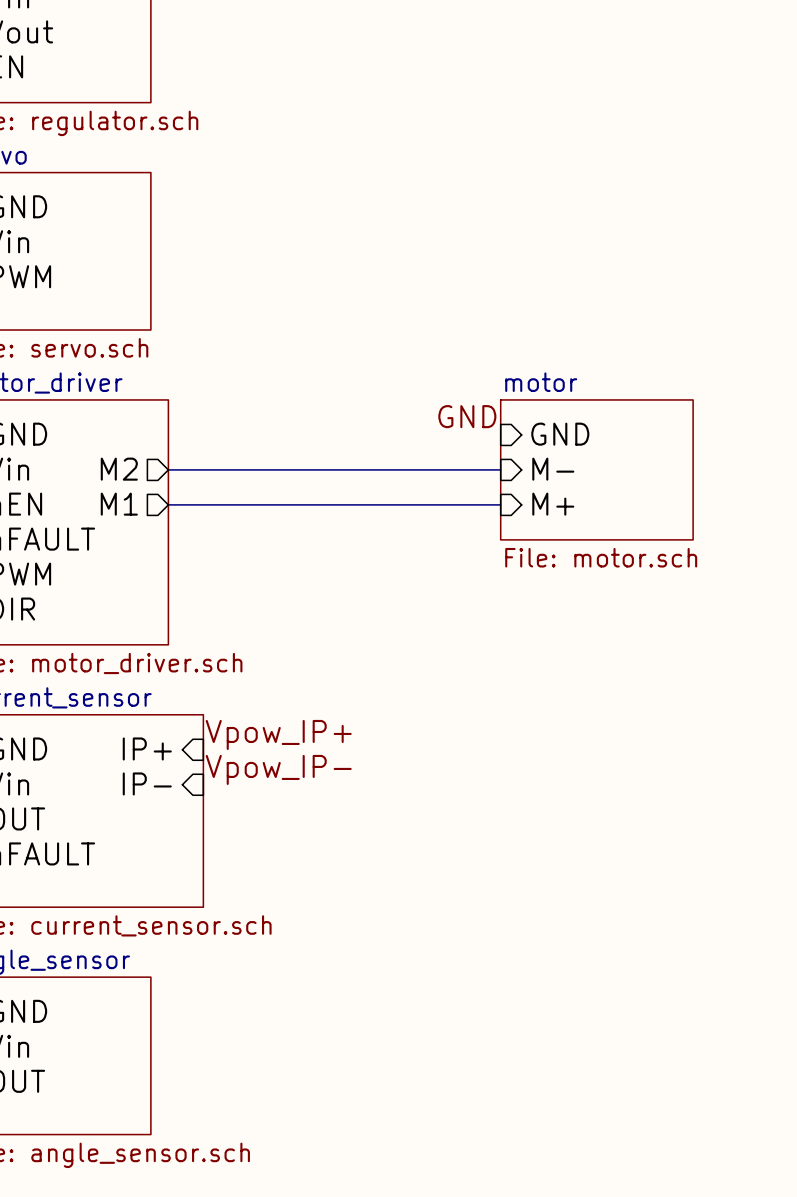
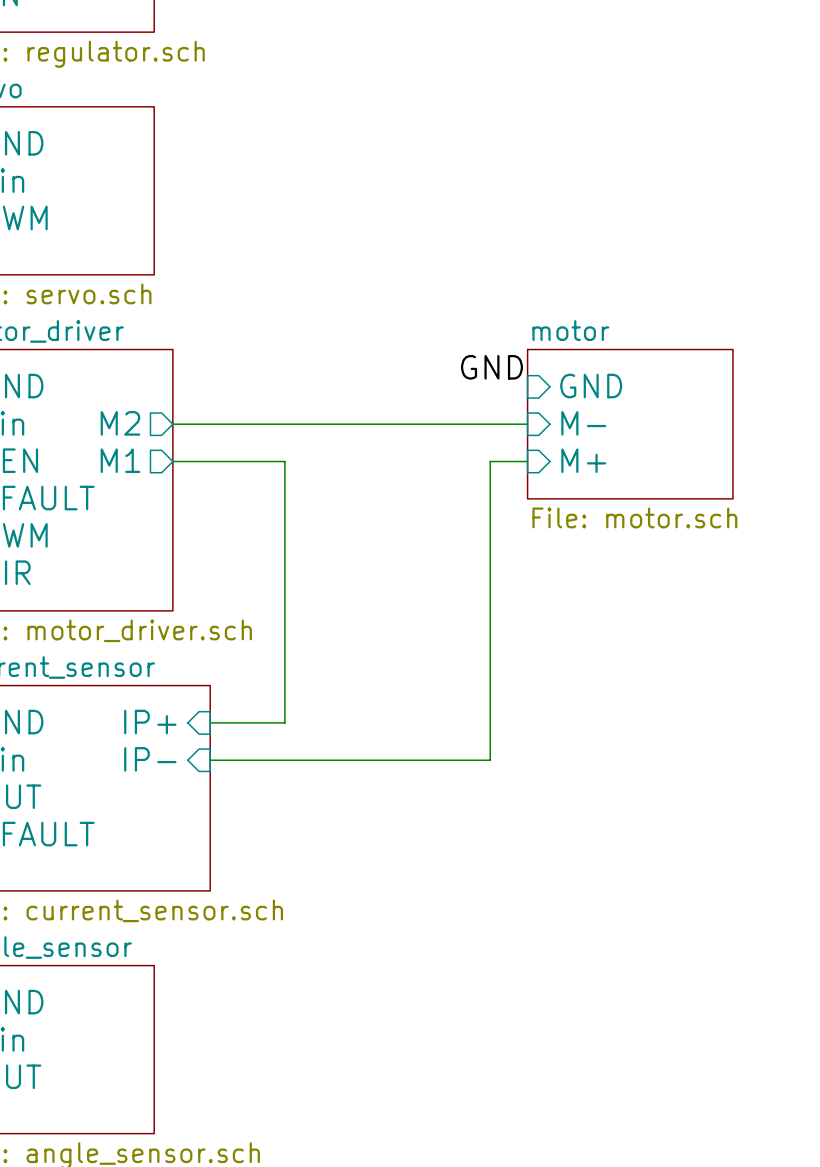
wire: (273, 504) (465, 504) -> (210, 760) (490, 760) (490, 461)
wire: none -> (284, 461) (284, 722) (210, 722)
label: Vpow_IP+ (278, 734) -> none
label: Vpow_IP- (278, 769) -> none

